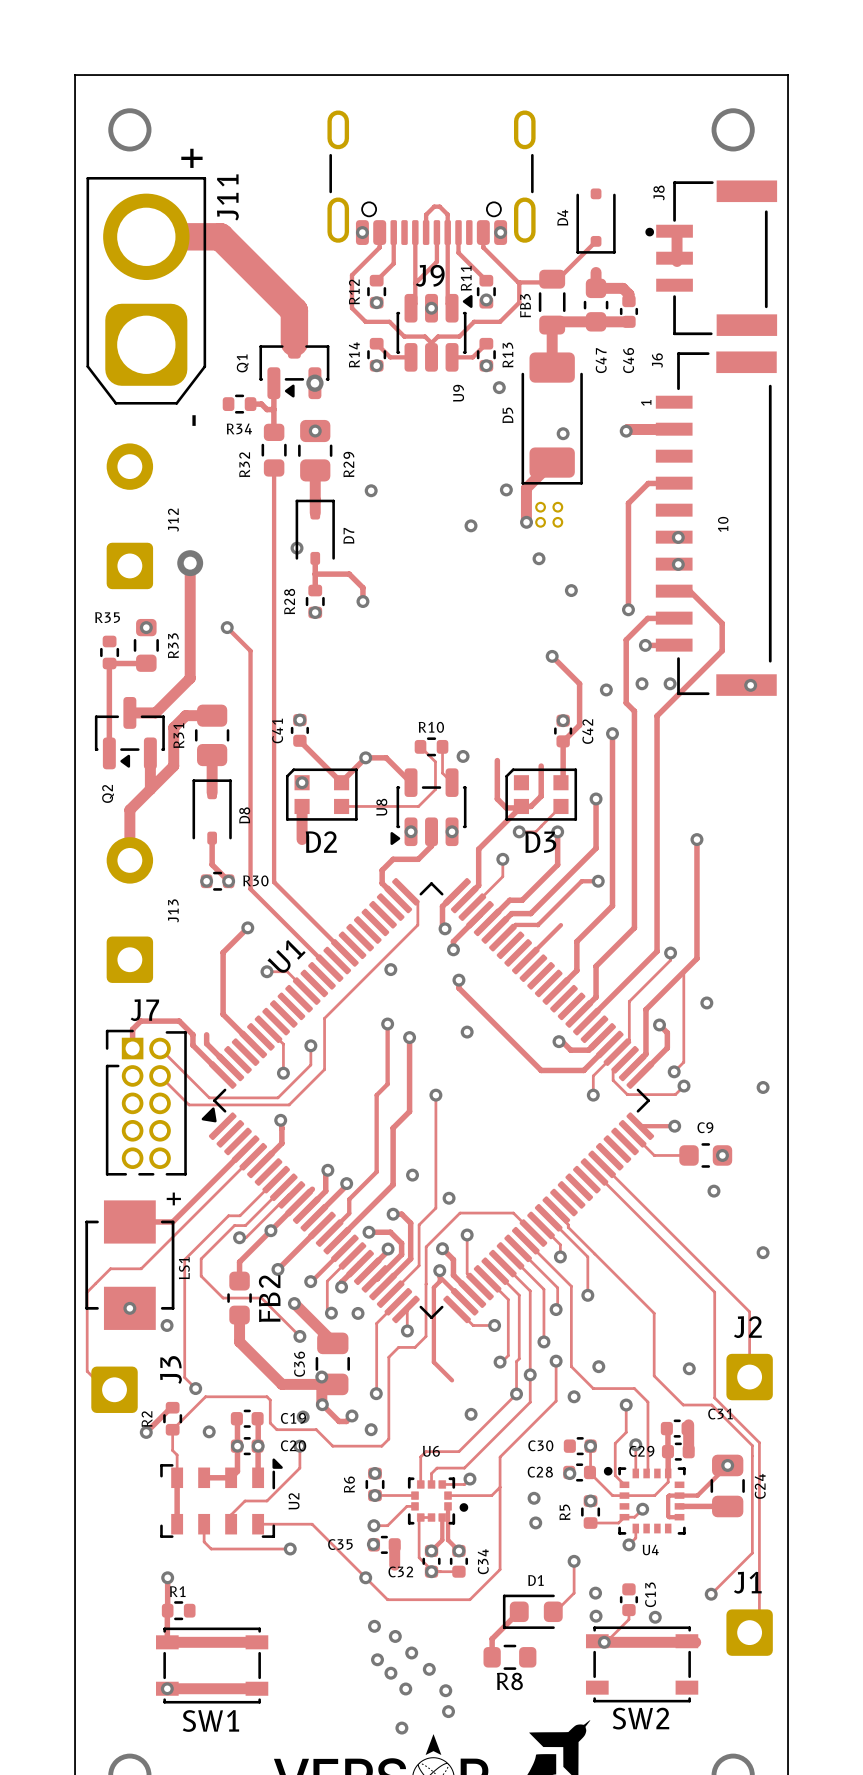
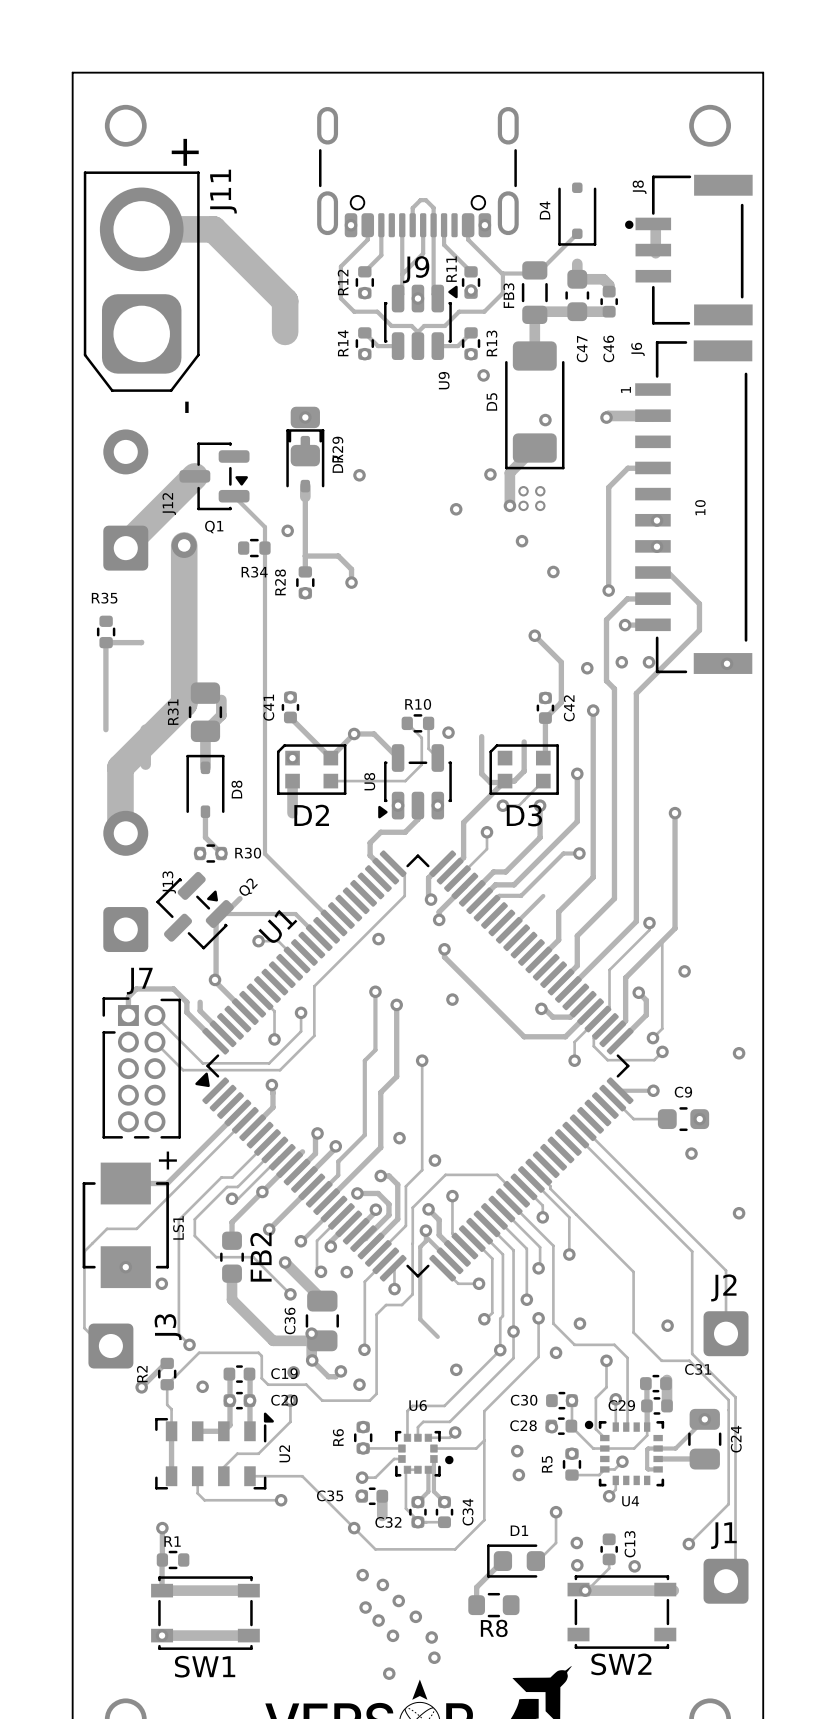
Q1 rotation: 0° (294, 362) -> 90° counterclockwise (214, 476)
Q1 position: (294, 362) -> (214, 476)
track: (273, 383) (273, 432) -> none
via: (314, 383) -> none
R34 position: (239, 404) -> (254, 548)
track: (250, 404) (261, 404) (266, 409) (273, 409) -> none
R32: (274, 450) -> none
track: (274, 467) (274, 882) -> (234, 496) (264, 527) (265, 854)
track: (315, 470) (315, 501) -> none
track: none -> (194, 476) (125, 545) (125, 548)
track: none -> (305, 496) (305, 540)
D7 position: (315, 532) -> (305, 460)
track width: thin (190, 563) (190, 678) -> thick (184, 545) (184, 656)
via: (146, 627) -> none
track: (227, 627) (250, 650) (250, 889) (305, 943) -> (219, 914) (295, 914)
via: (227, 627) -> none
R33: (146, 645) -> none
track: (190, 678) (155, 712) (129, 712) -> (184, 656) (184, 703) (120, 767) (120, 833)
track: (212, 715) (185, 715) (173, 727) (173, 766) (129, 809) (129, 860) -> none
track: none -> (221, 699) (221, 715) (205, 731)
Q2 rotation: 0° (129, 733) -> 135° counterclockwise (195, 910)
Q2 position: (129, 733) -> (195, 910)
via position: (247, 927) -> (215, 979)

